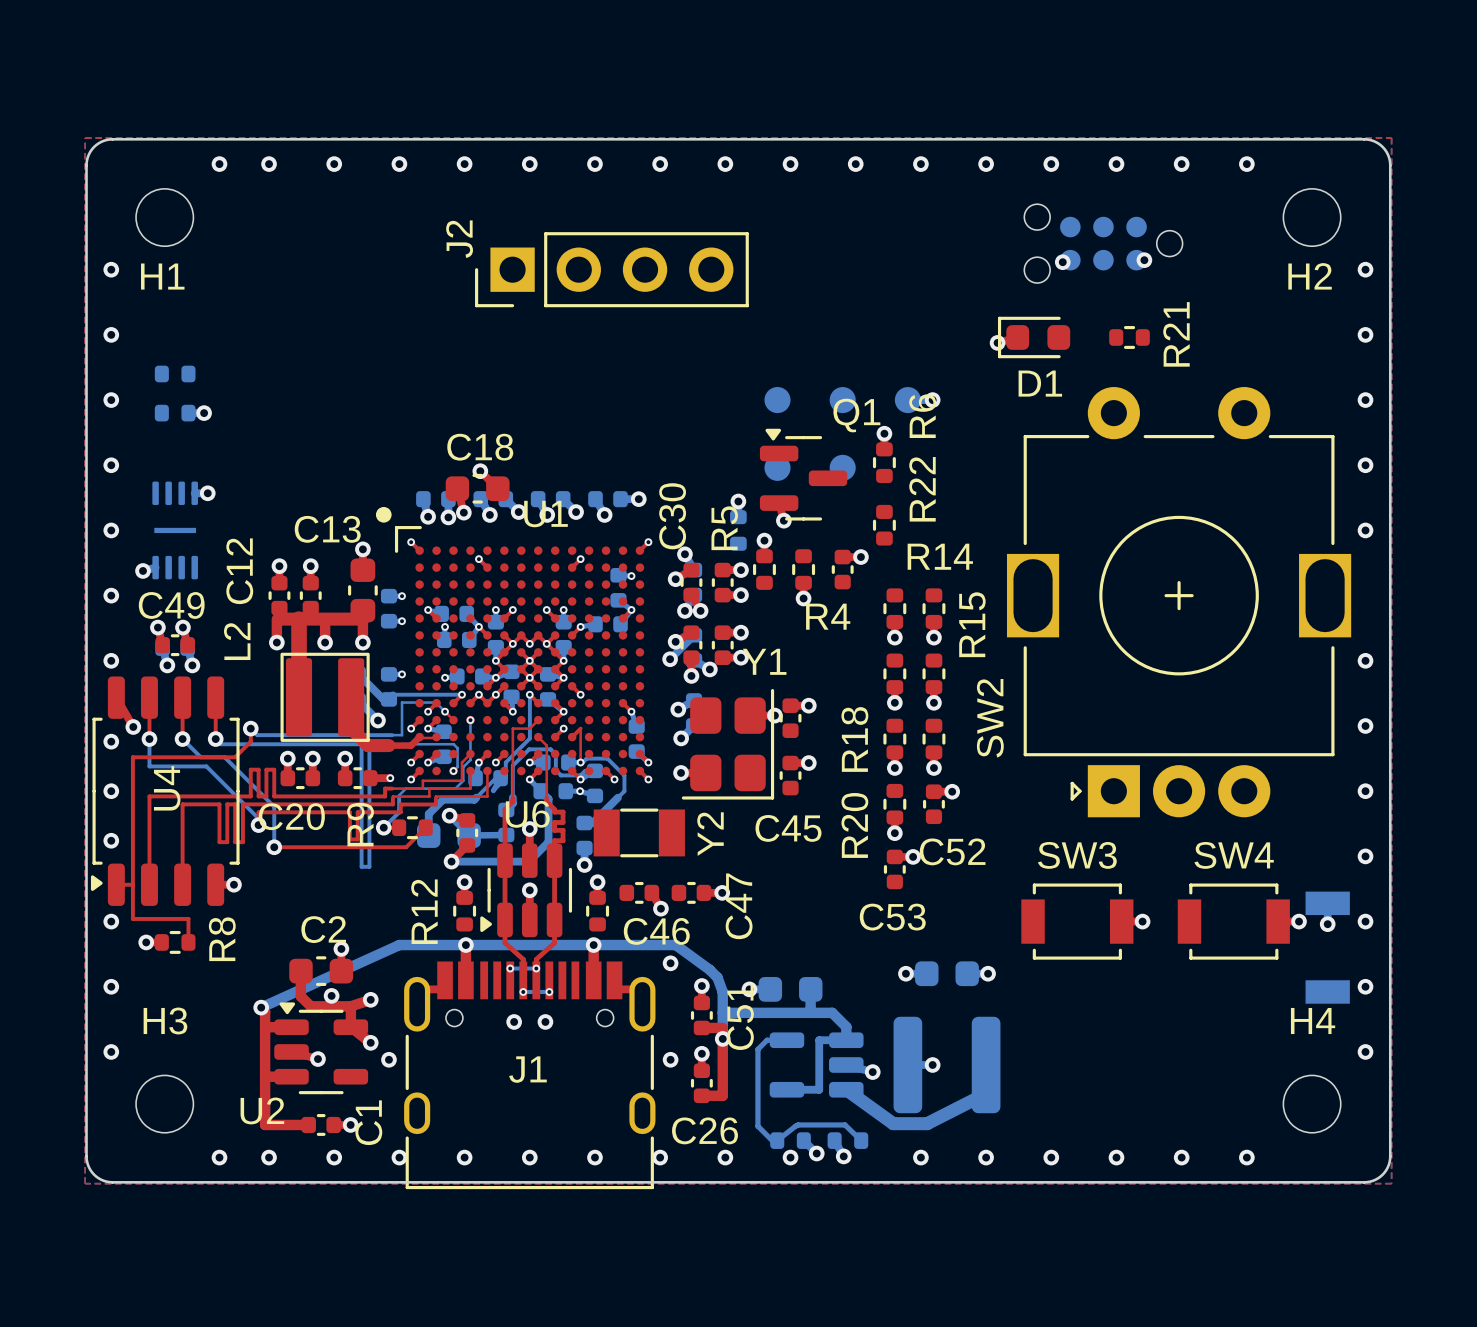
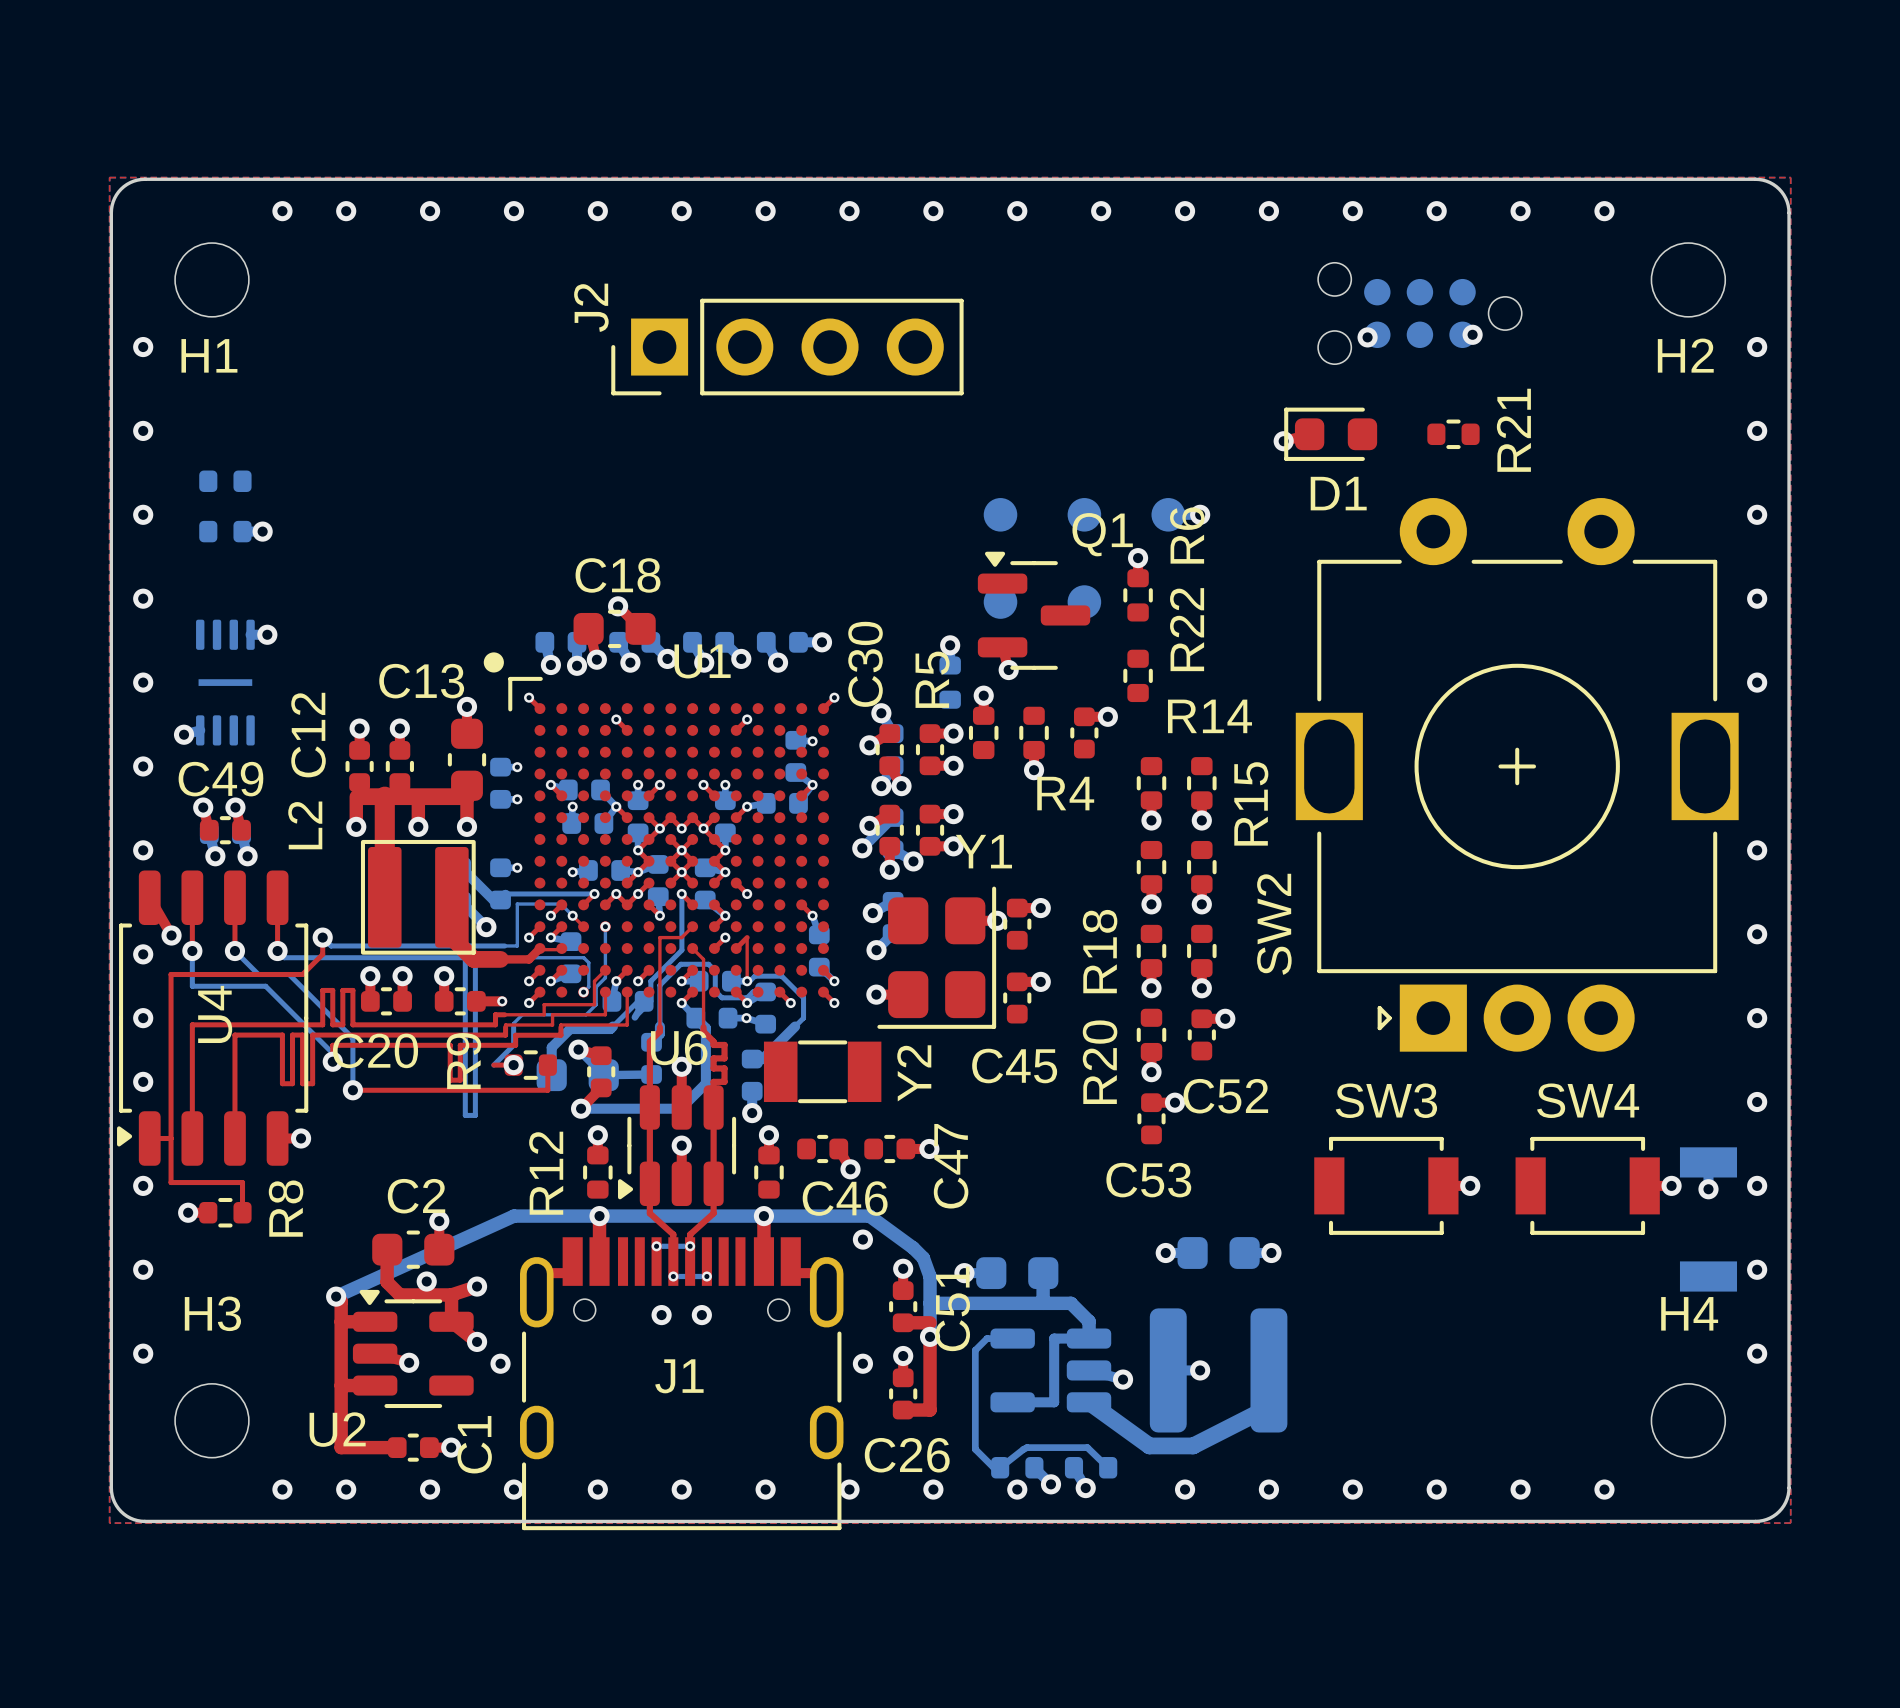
via position: (383, 827) -> (513, 1065)
top track: (425, 827) (406, 847) -> (547, 1065) (547, 1090) (522, 1090)

